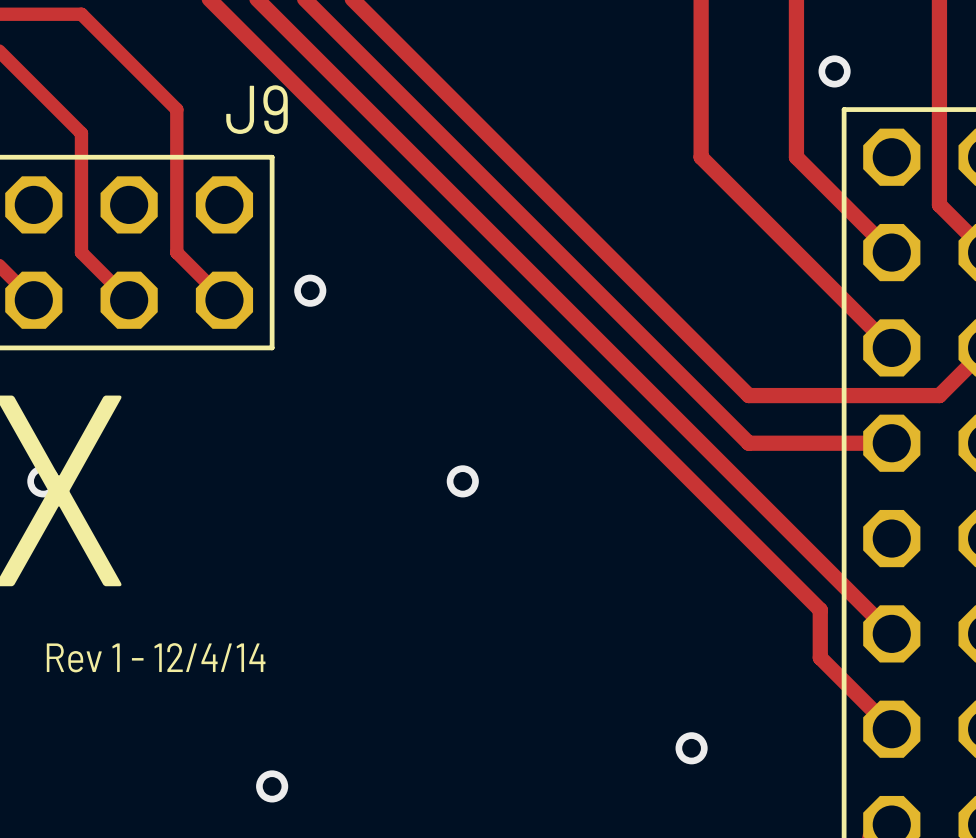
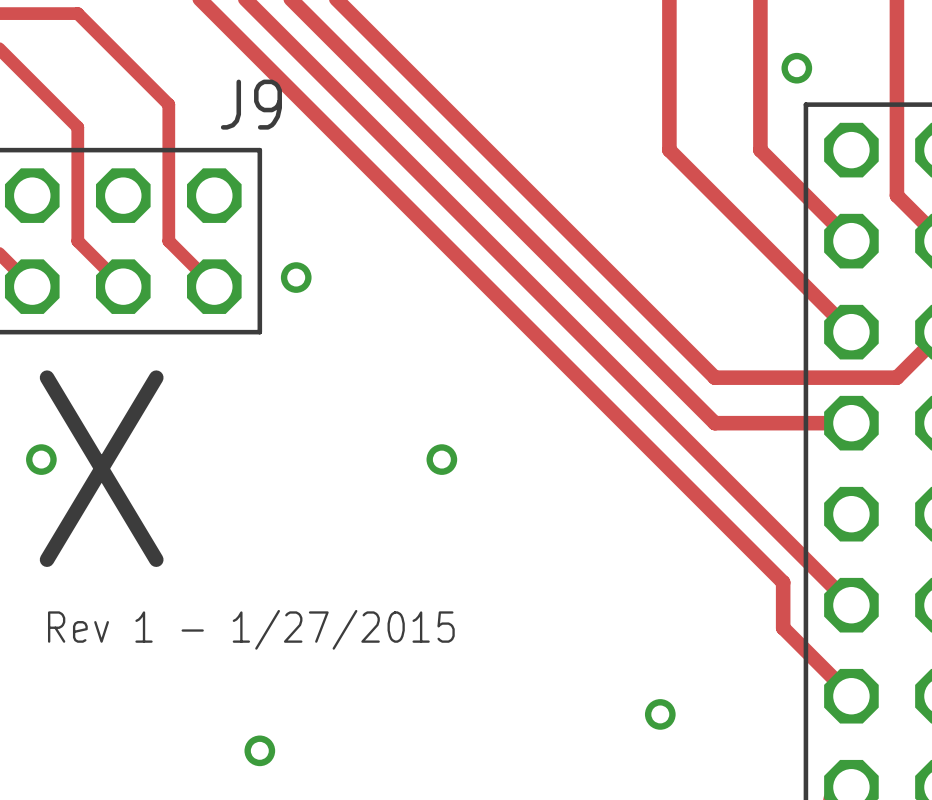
text: Rev 1 - 12/4/14 (156, 657) -> Rev 1 - 1/27/2015 (251, 629)

